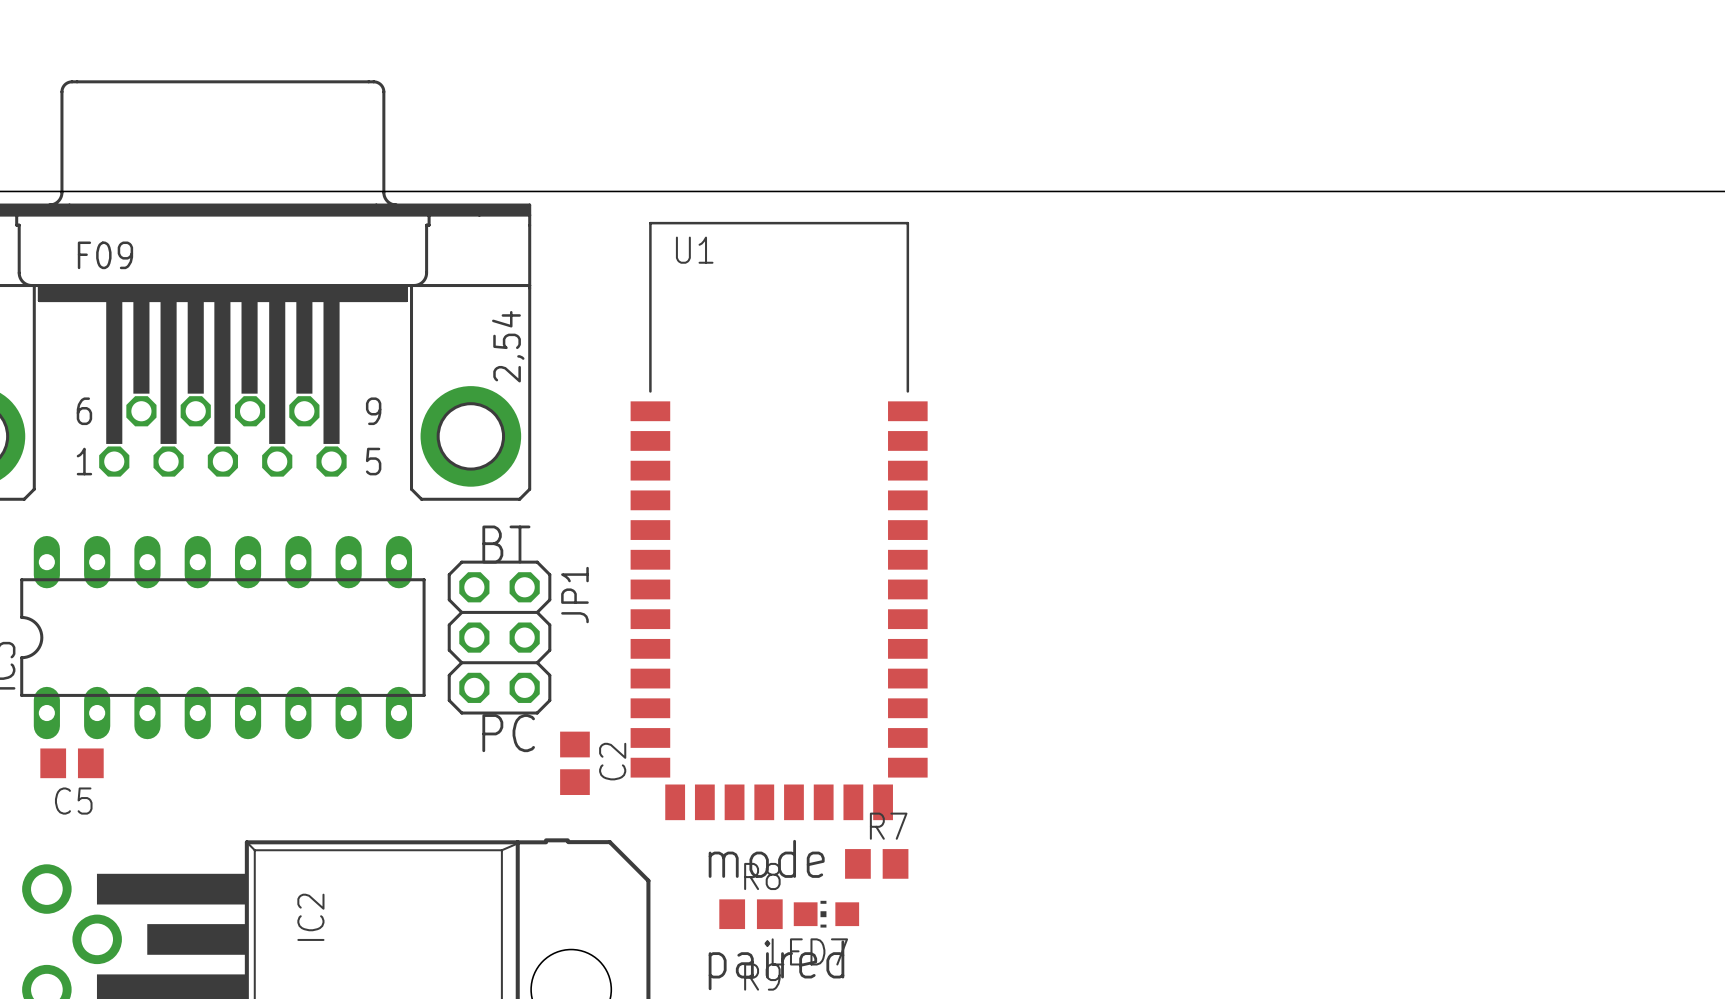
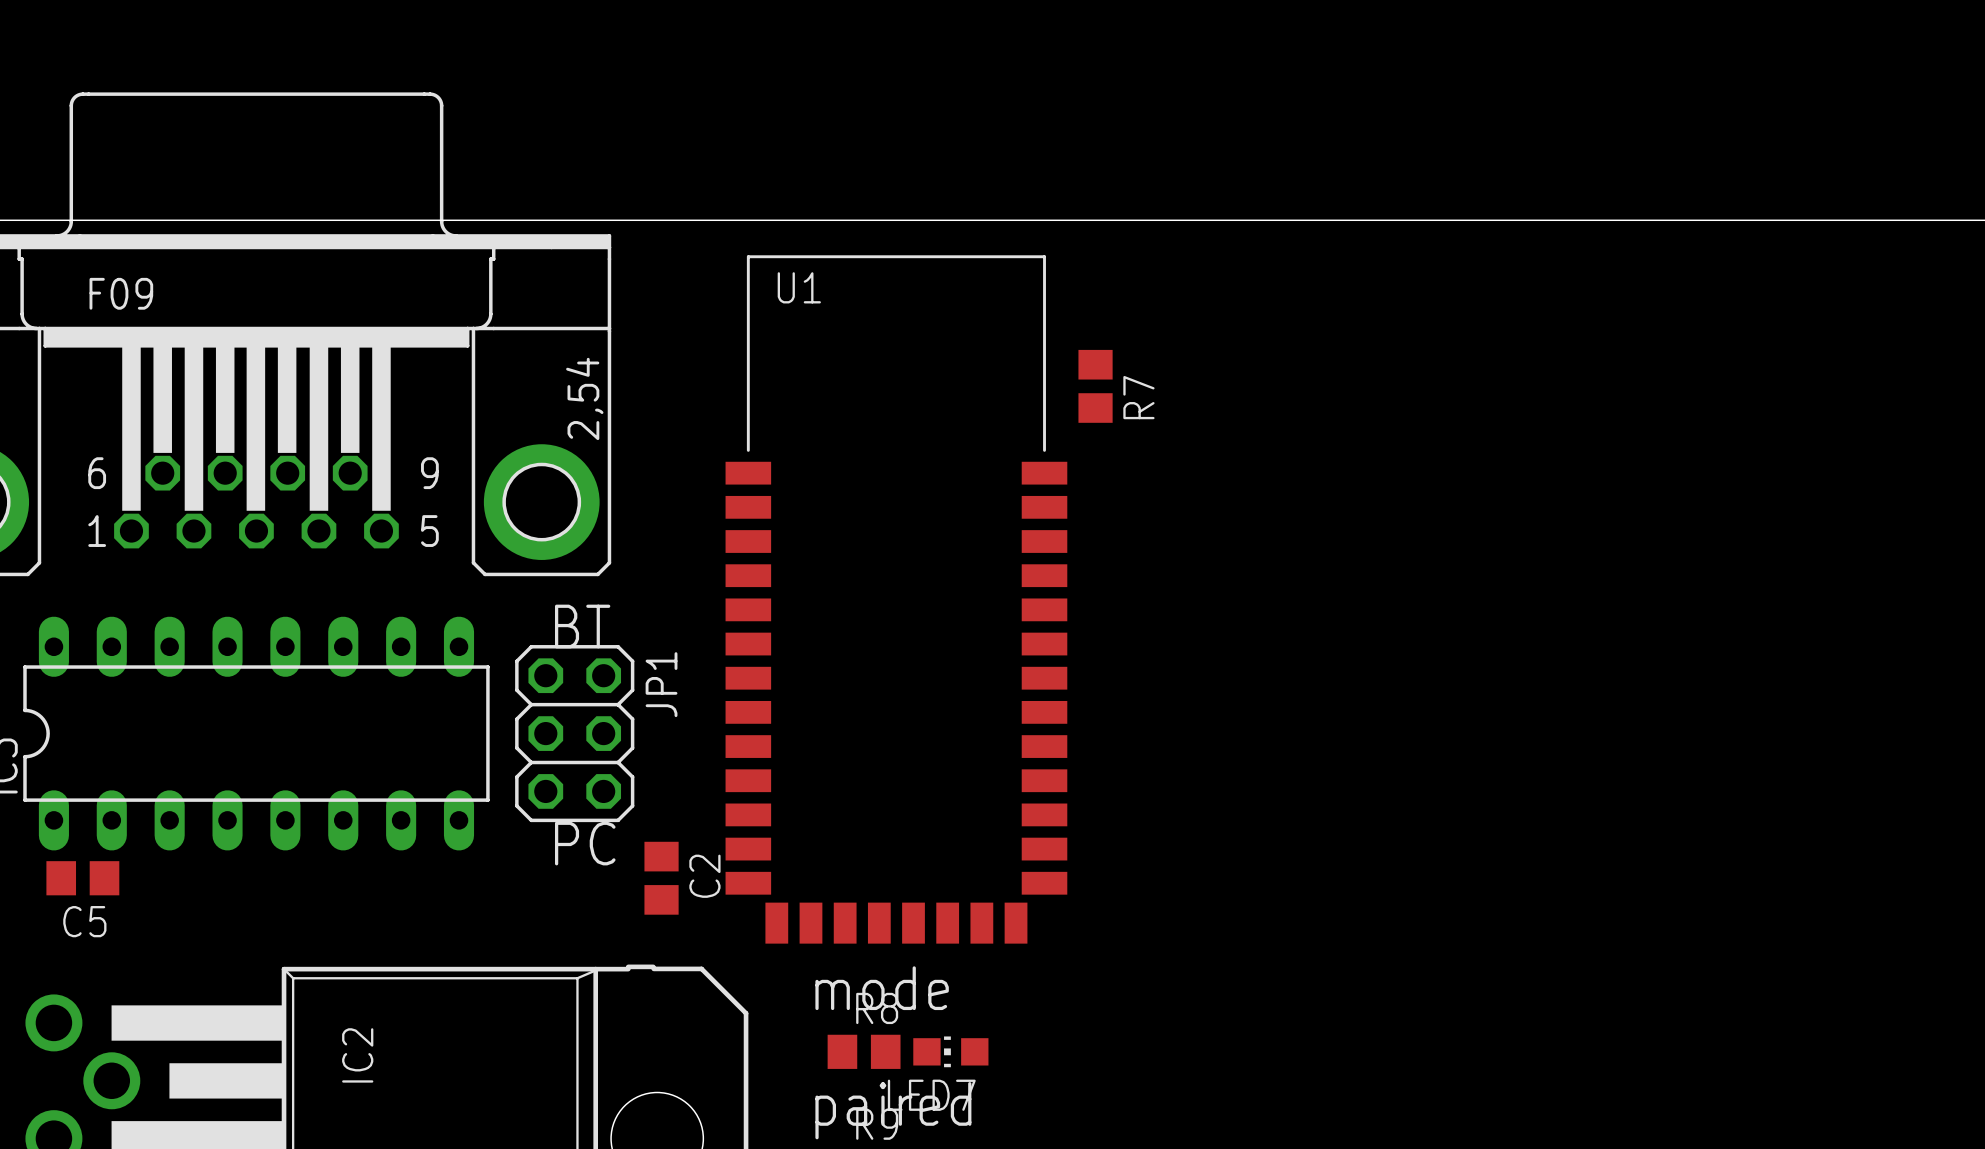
R7 rotation: 0° (876, 863) -> 90° clockwise (1095, 386)
R7 position: (876, 863) -> (1095, 386)

